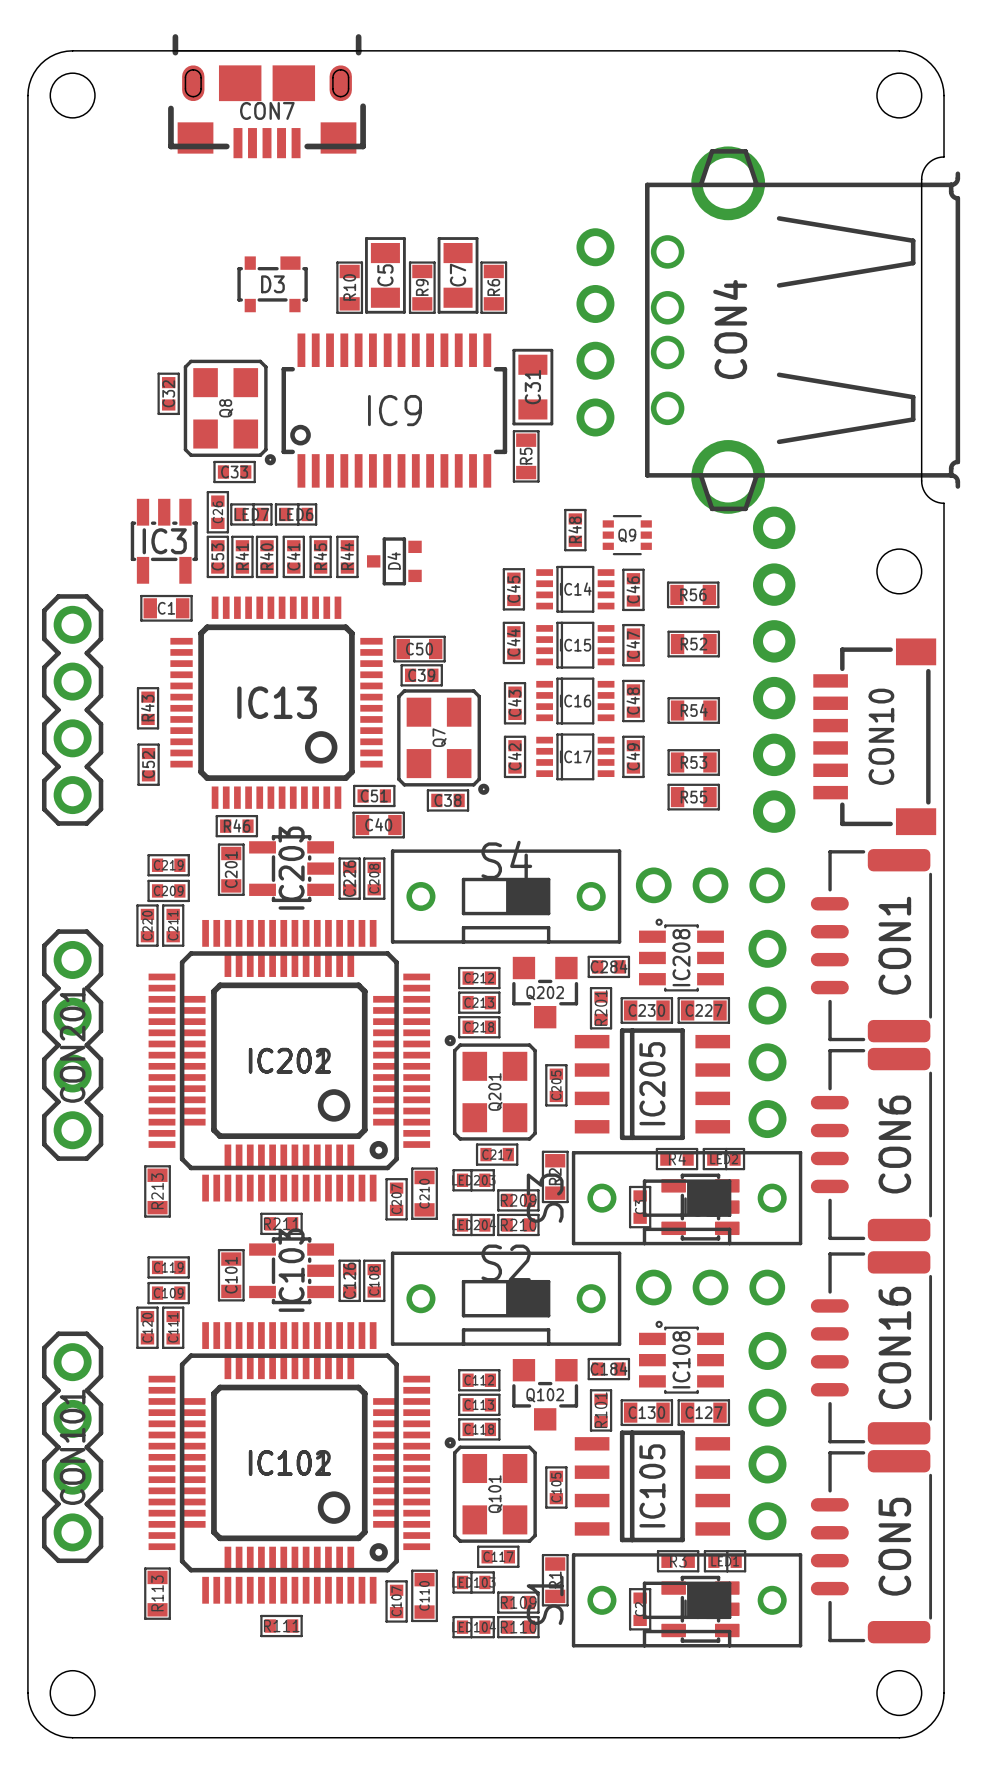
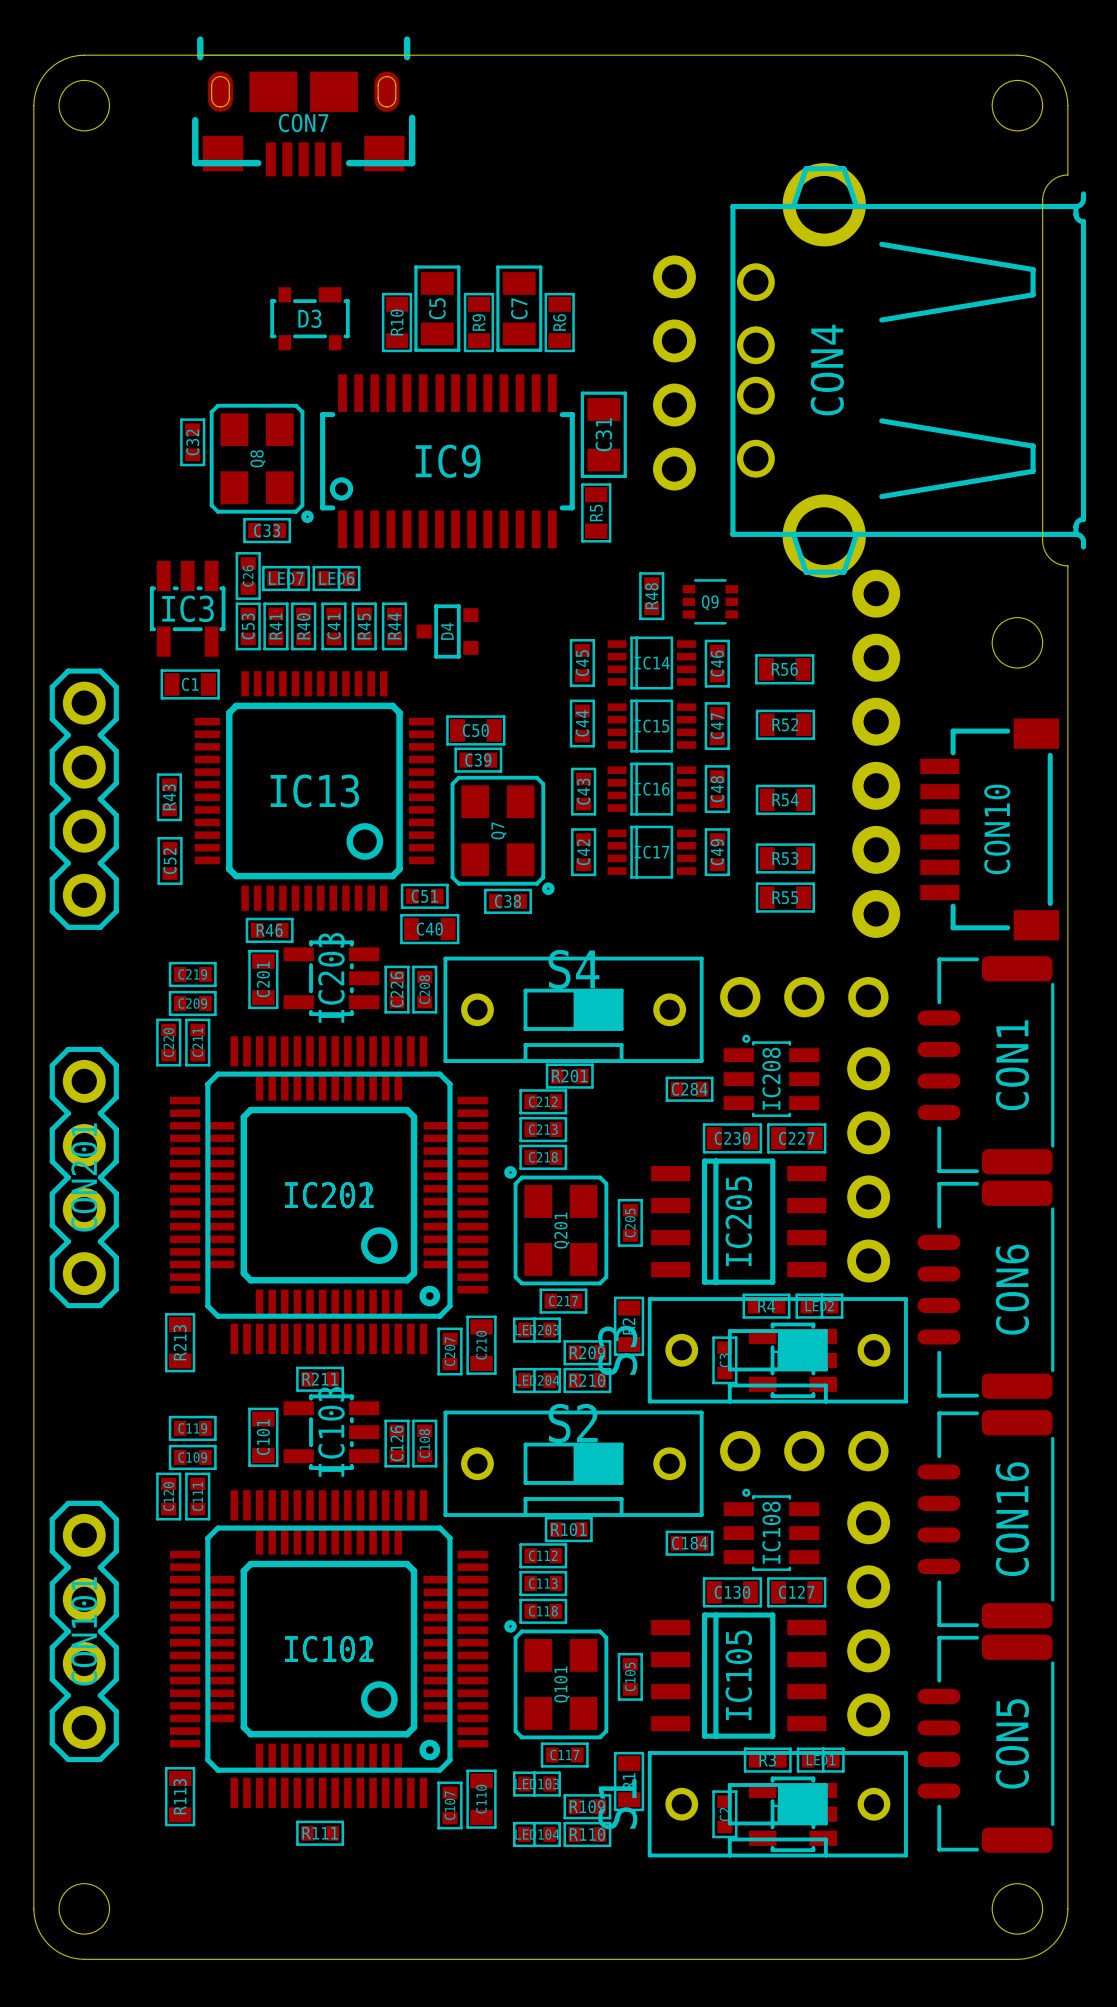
Q202: (545, 992) -> none
R201 rotation: 0° (601, 1008) -> 90° clockwise (569, 1076)
R201 position: (601, 1008) -> (569, 1076)
Q102: (545, 1394) -> none
R101 rotation: 0° (601, 1410) -> 90° clockwise (568, 1529)
R101 position: (601, 1410) -> (568, 1529)

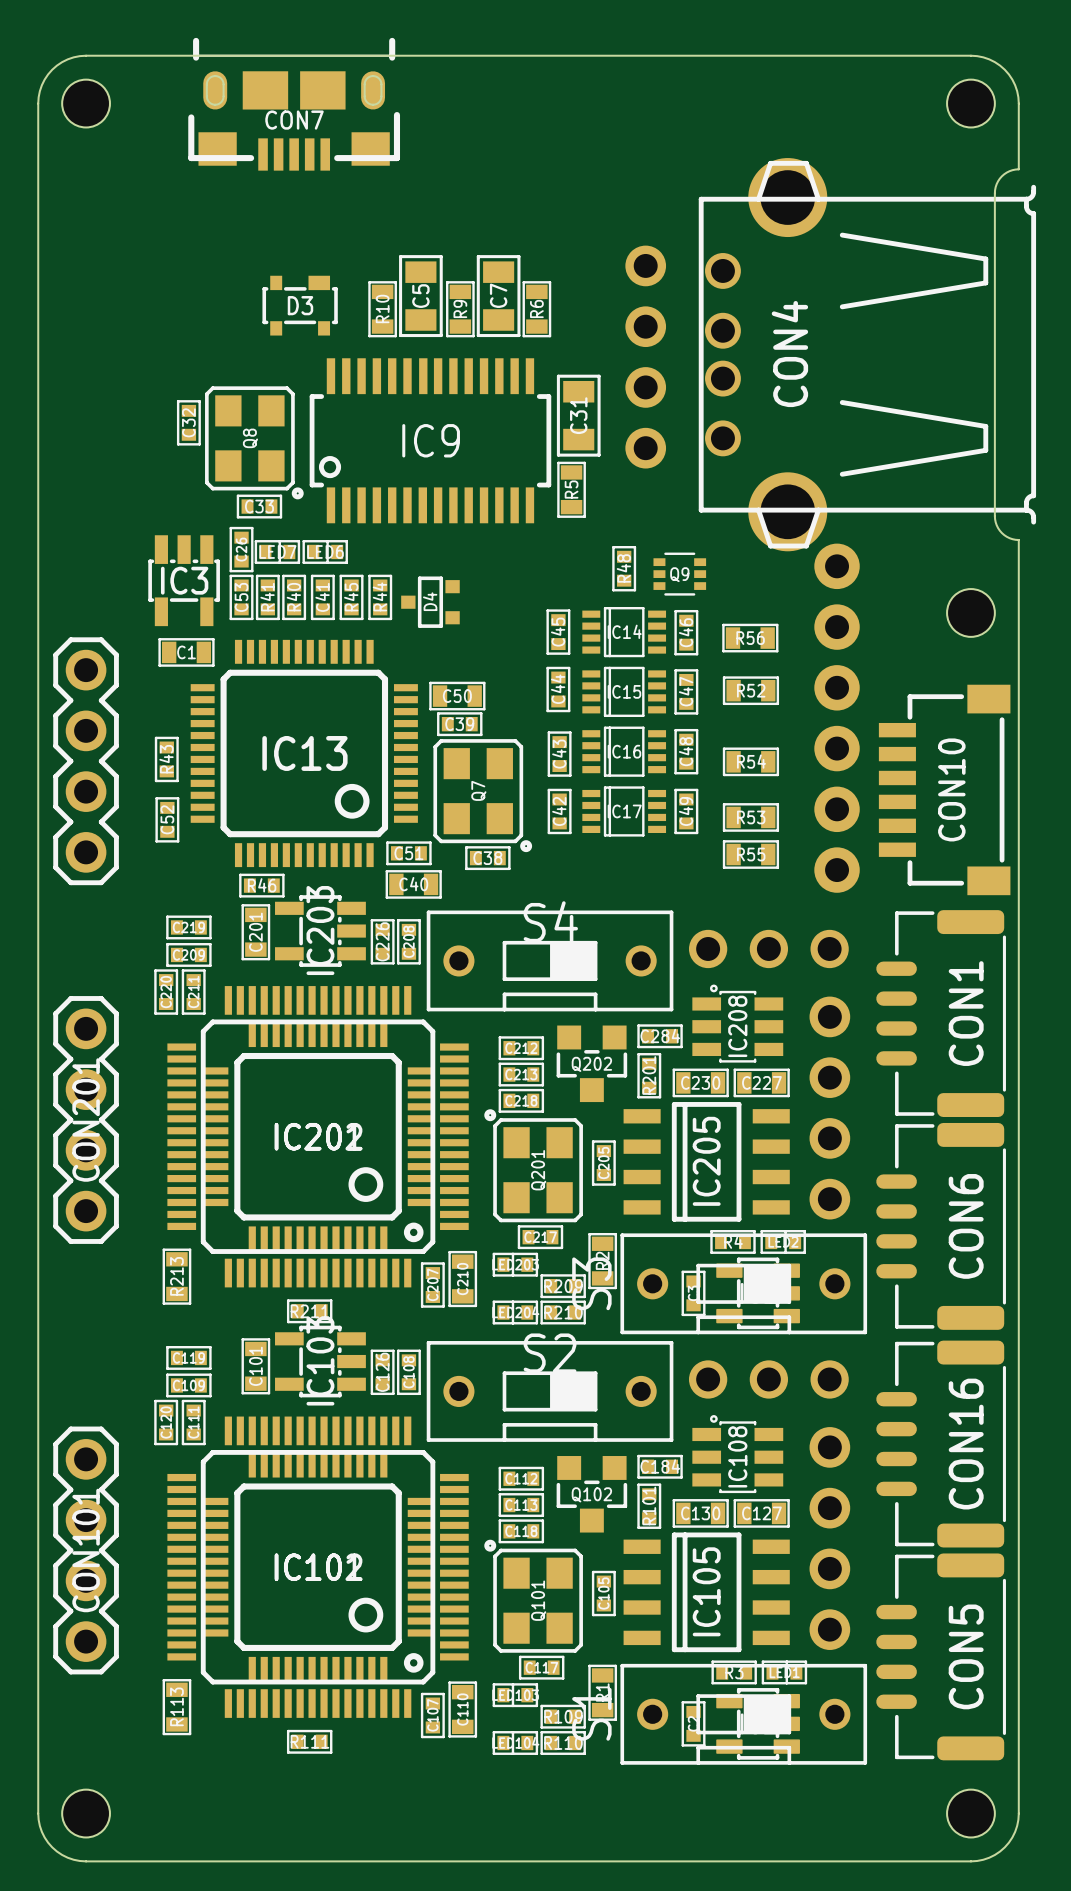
R201 rotation: 0° (569, 1076) -> 90° clockwise (649, 1075)
R201 position: (569, 1076) -> (649, 1075)
Q202: none -> (591, 1063)
R101 rotation: 0° (568, 1529) -> 90° clockwise (649, 1506)
R101 position: (568, 1529) -> (649, 1506)
Q102: none -> (591, 1494)

